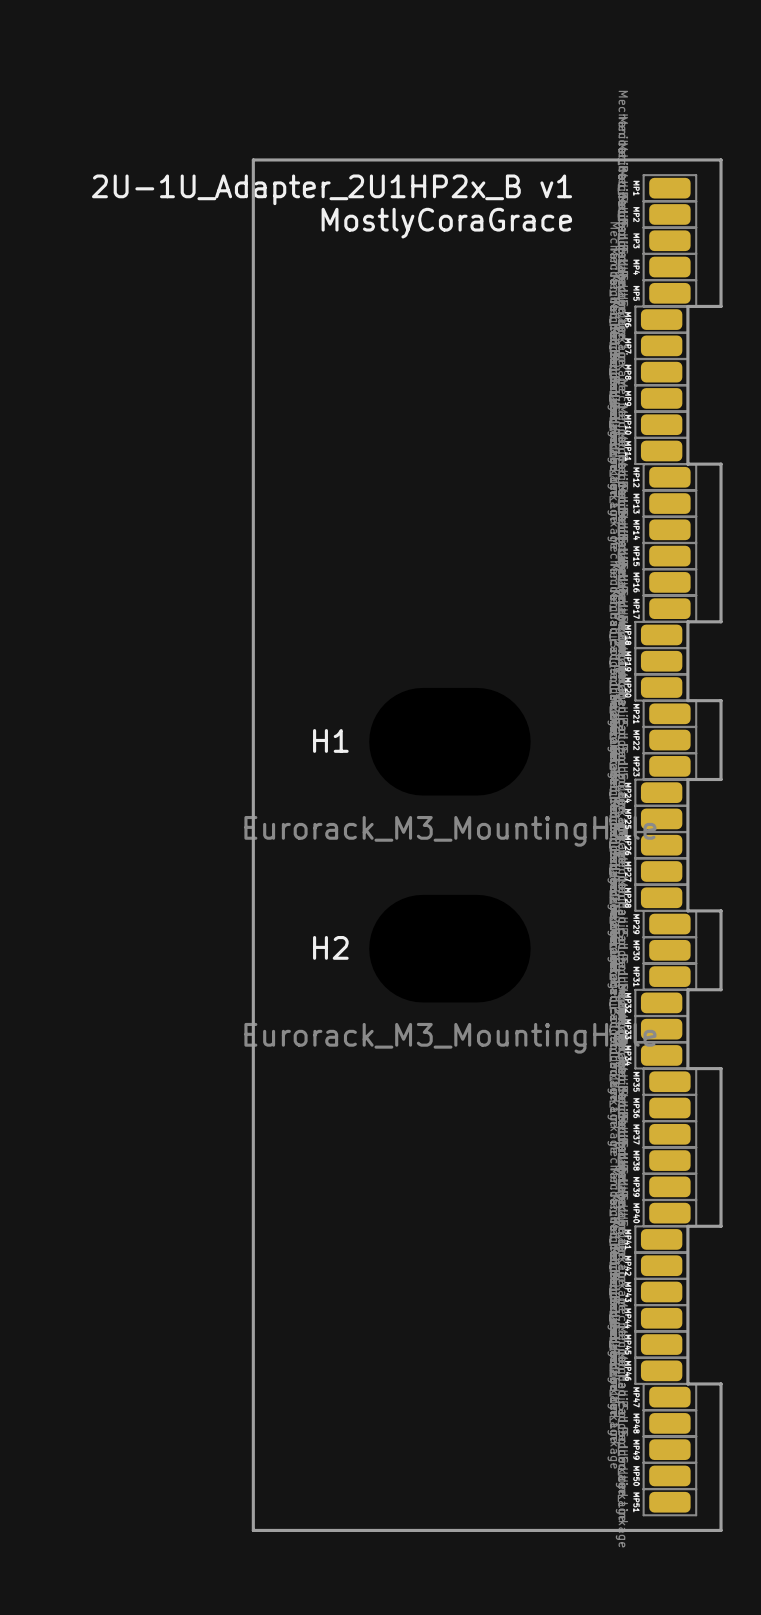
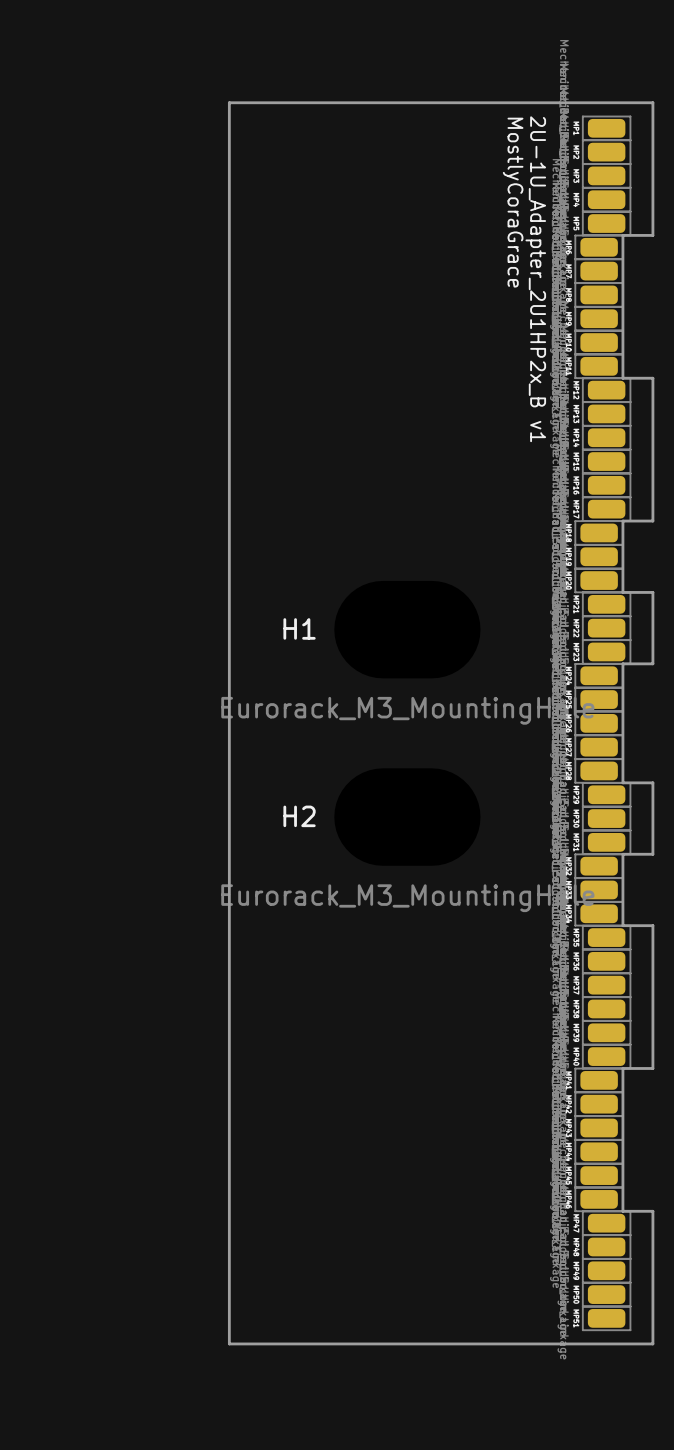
text: 2U-1U_Adapter_2U1HP2x_B v1 (332, 189) -> MostlyCoraGrace (513, 202)
text: MostlyCoraGrace (446, 223) -> none
text: none -> 2U-1U_Adapter_2U1HP2x_B v1 (535, 279)

